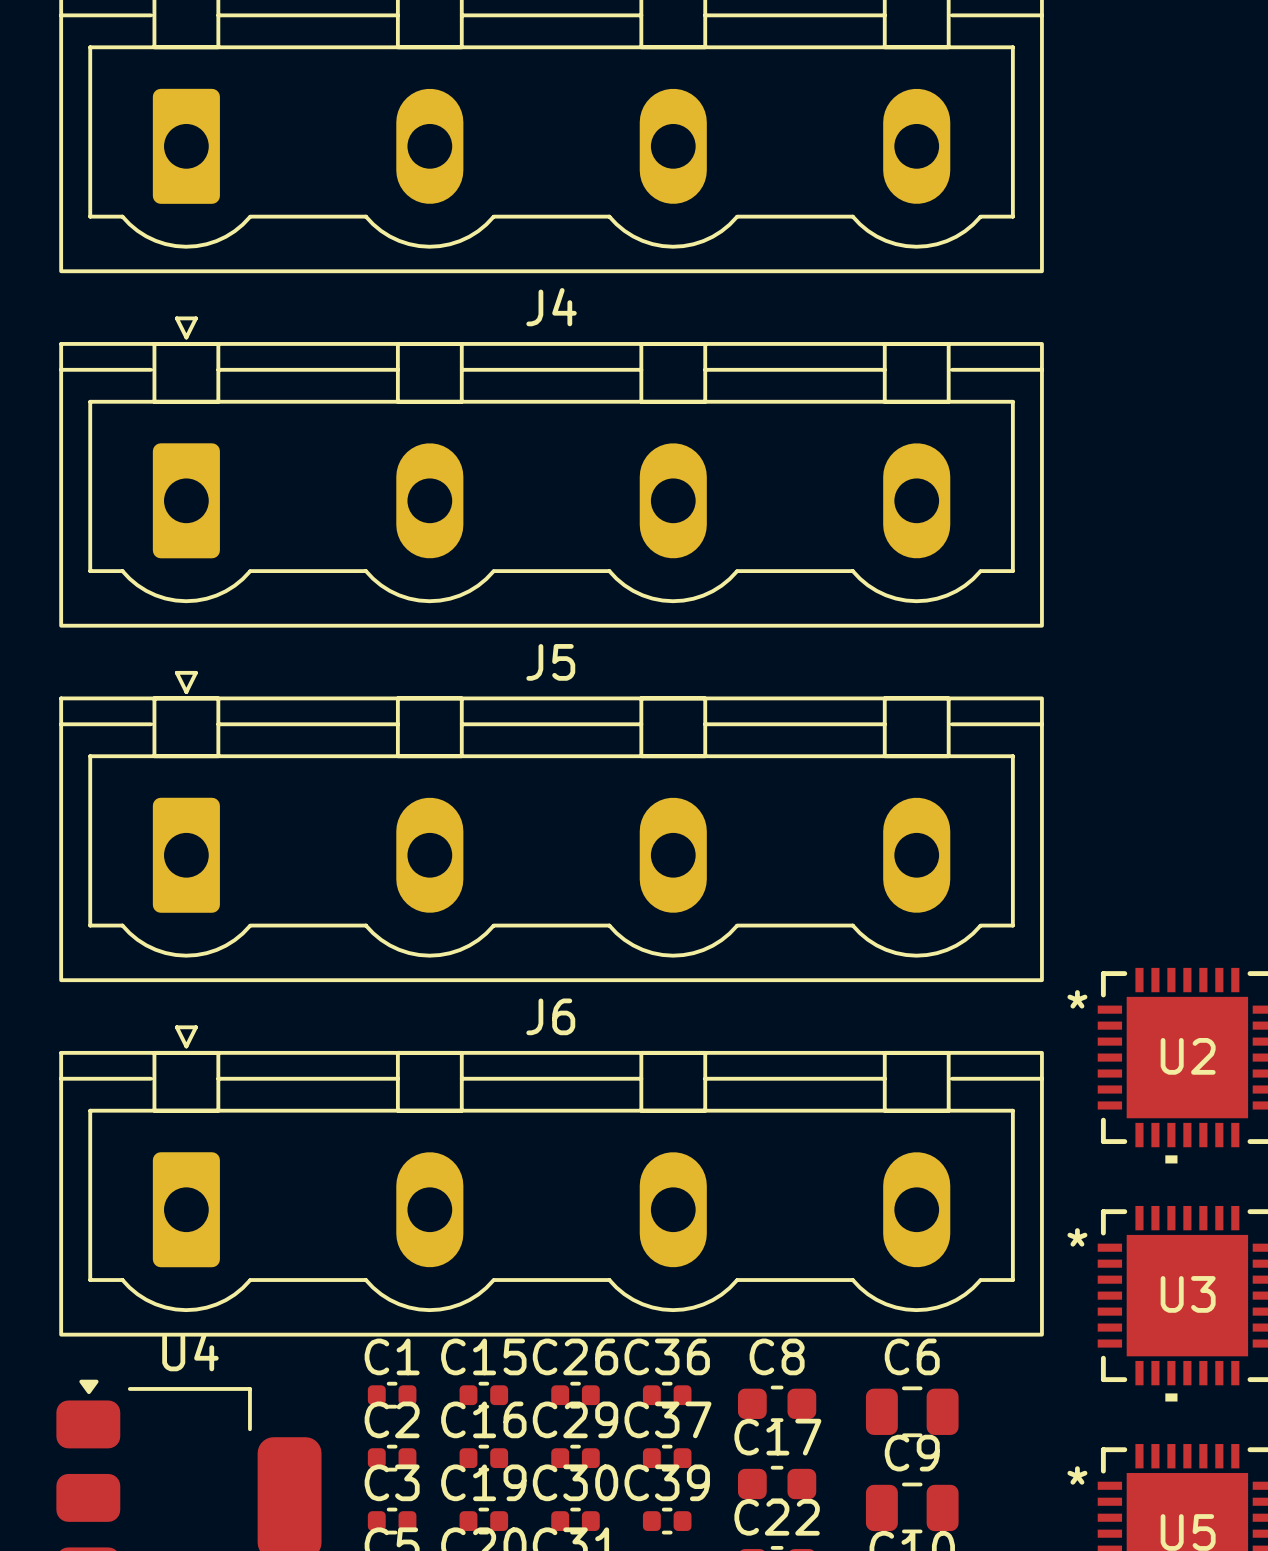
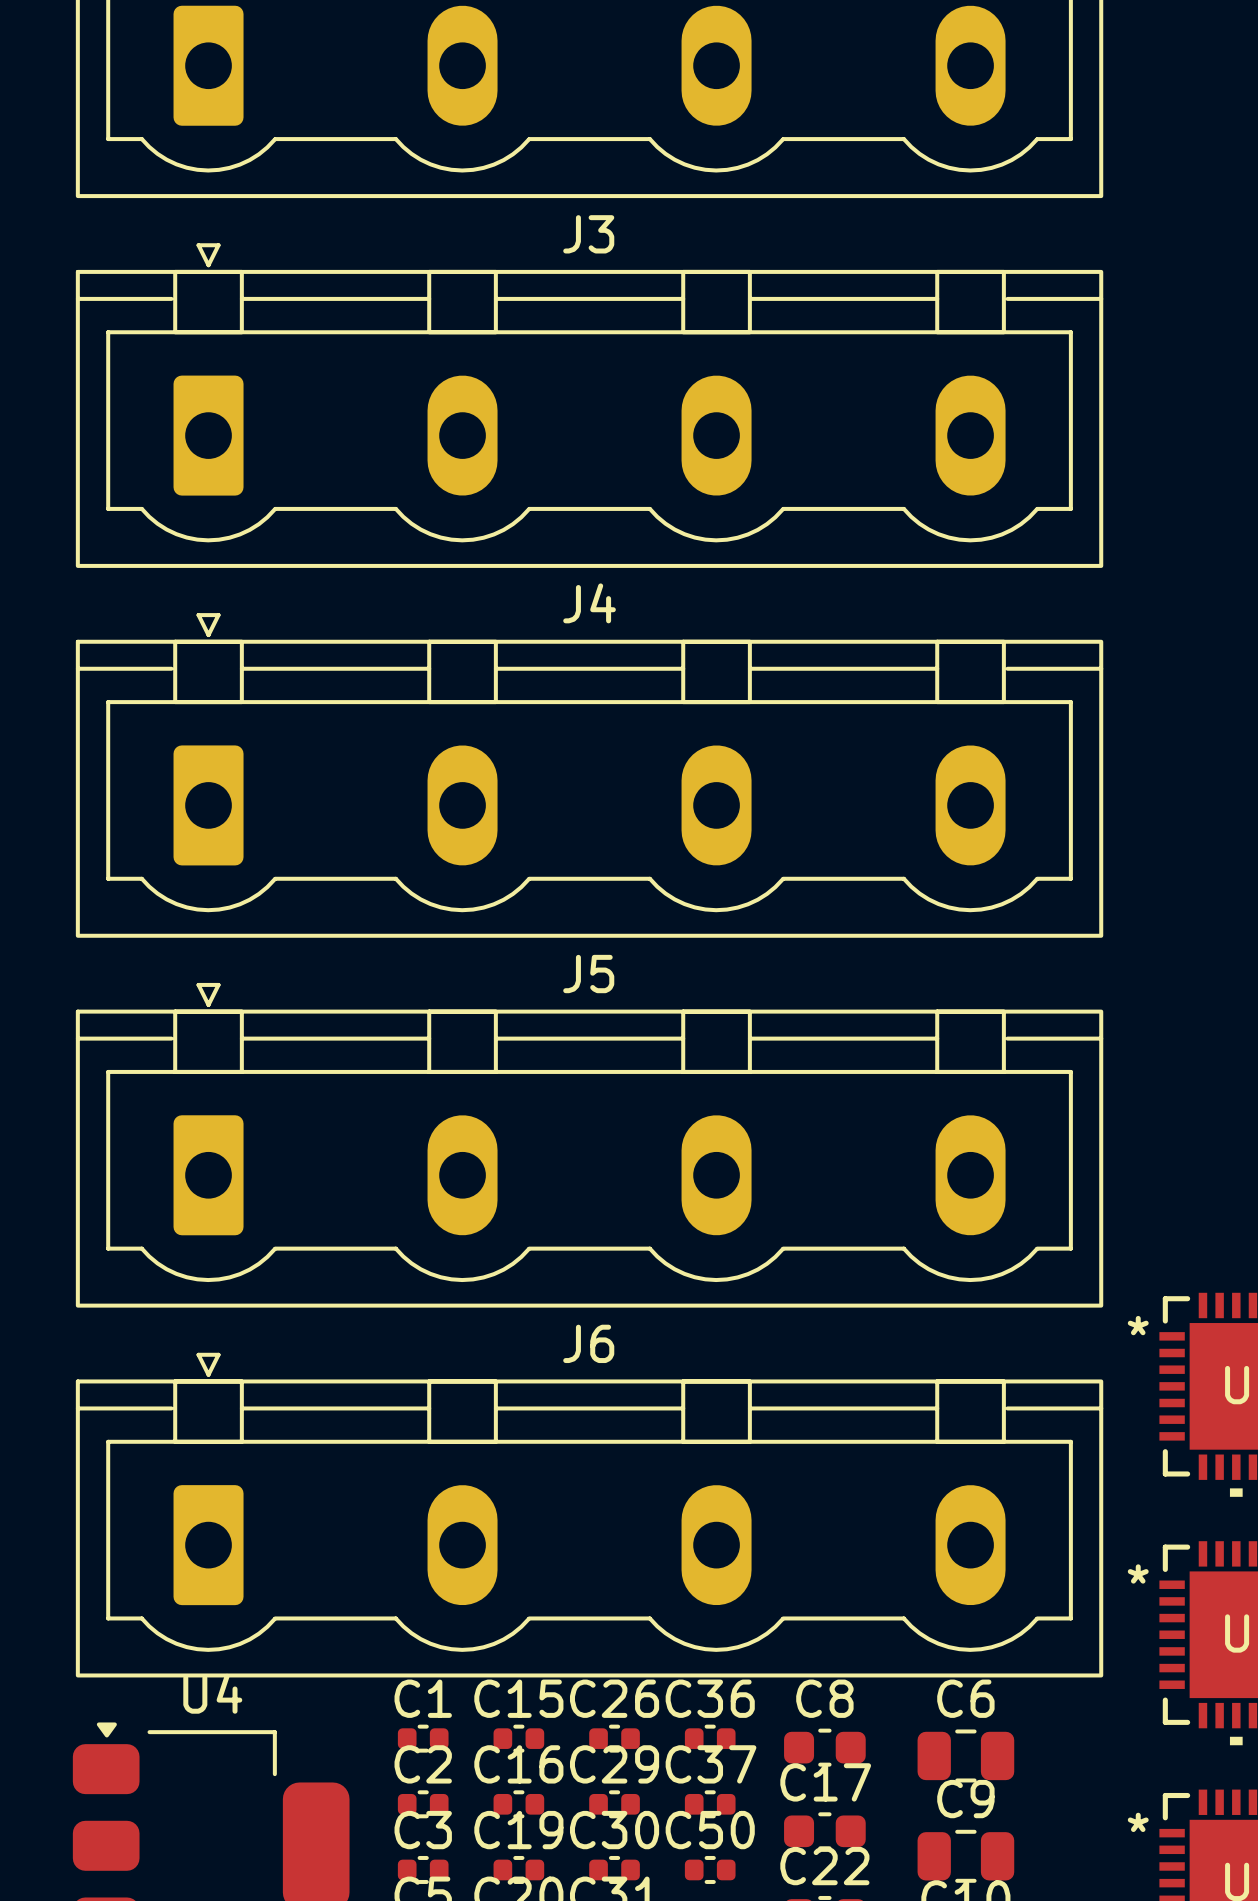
C39 name: C39 (667, 1482) -> C50 (710, 1830)

